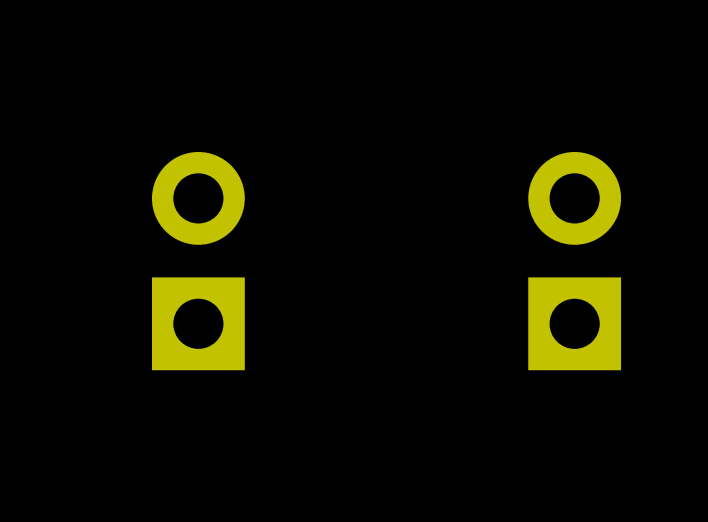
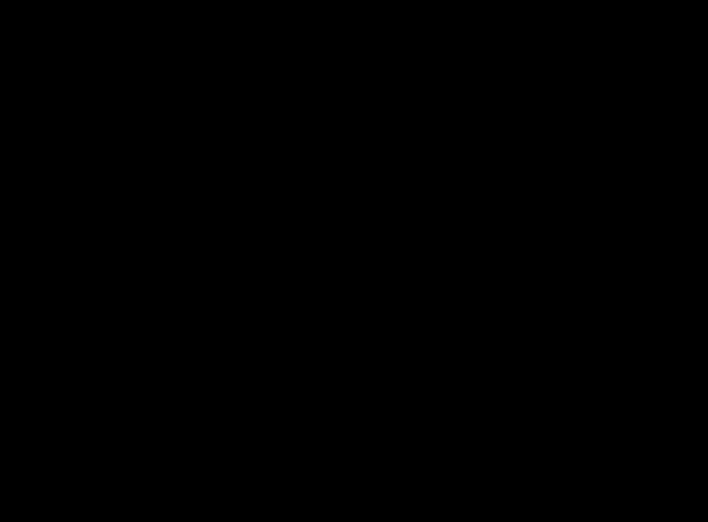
part: (198, 261) -> none
part: (574, 261) -> none

